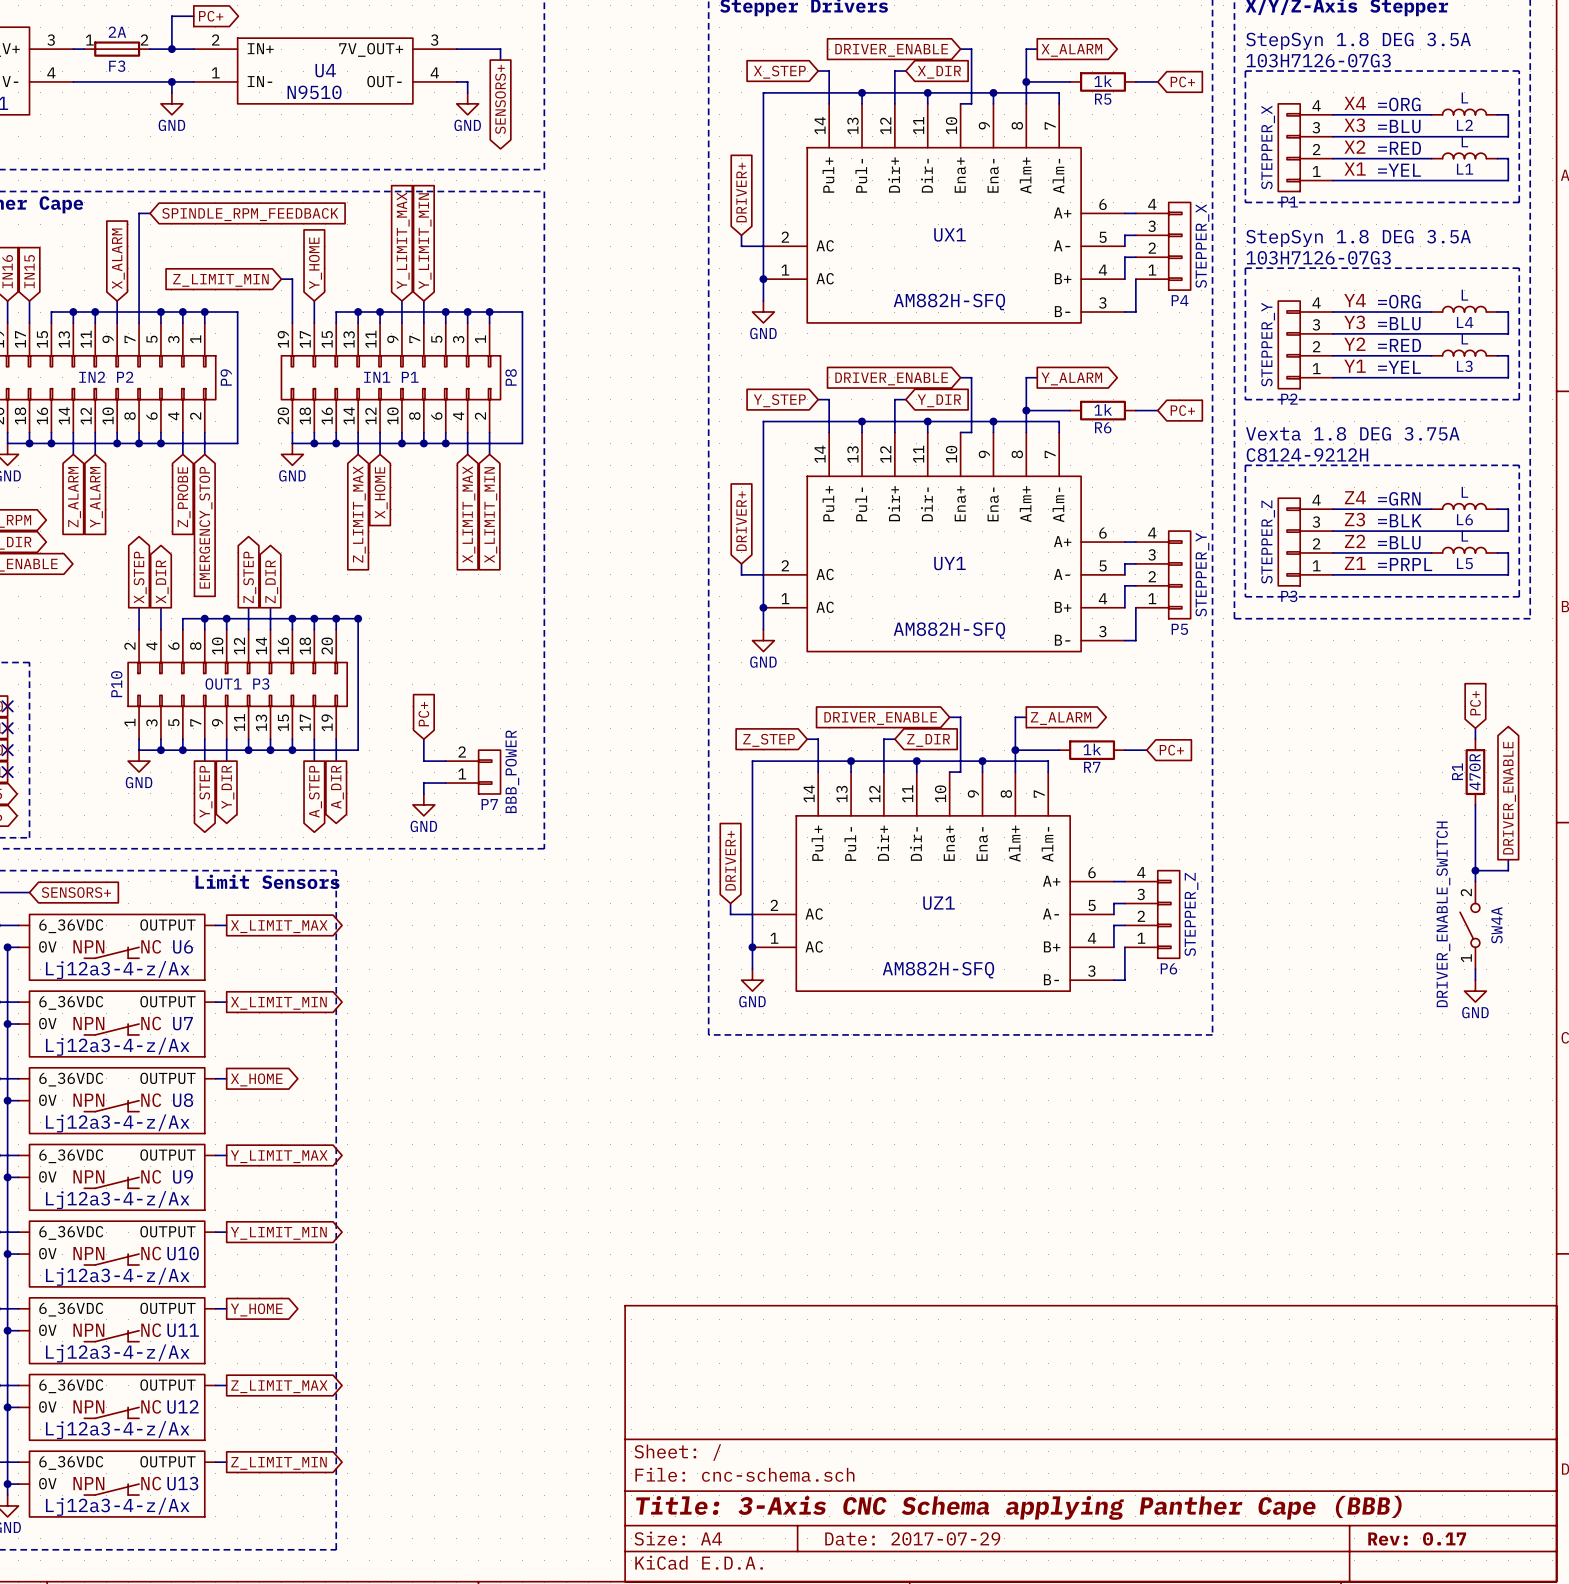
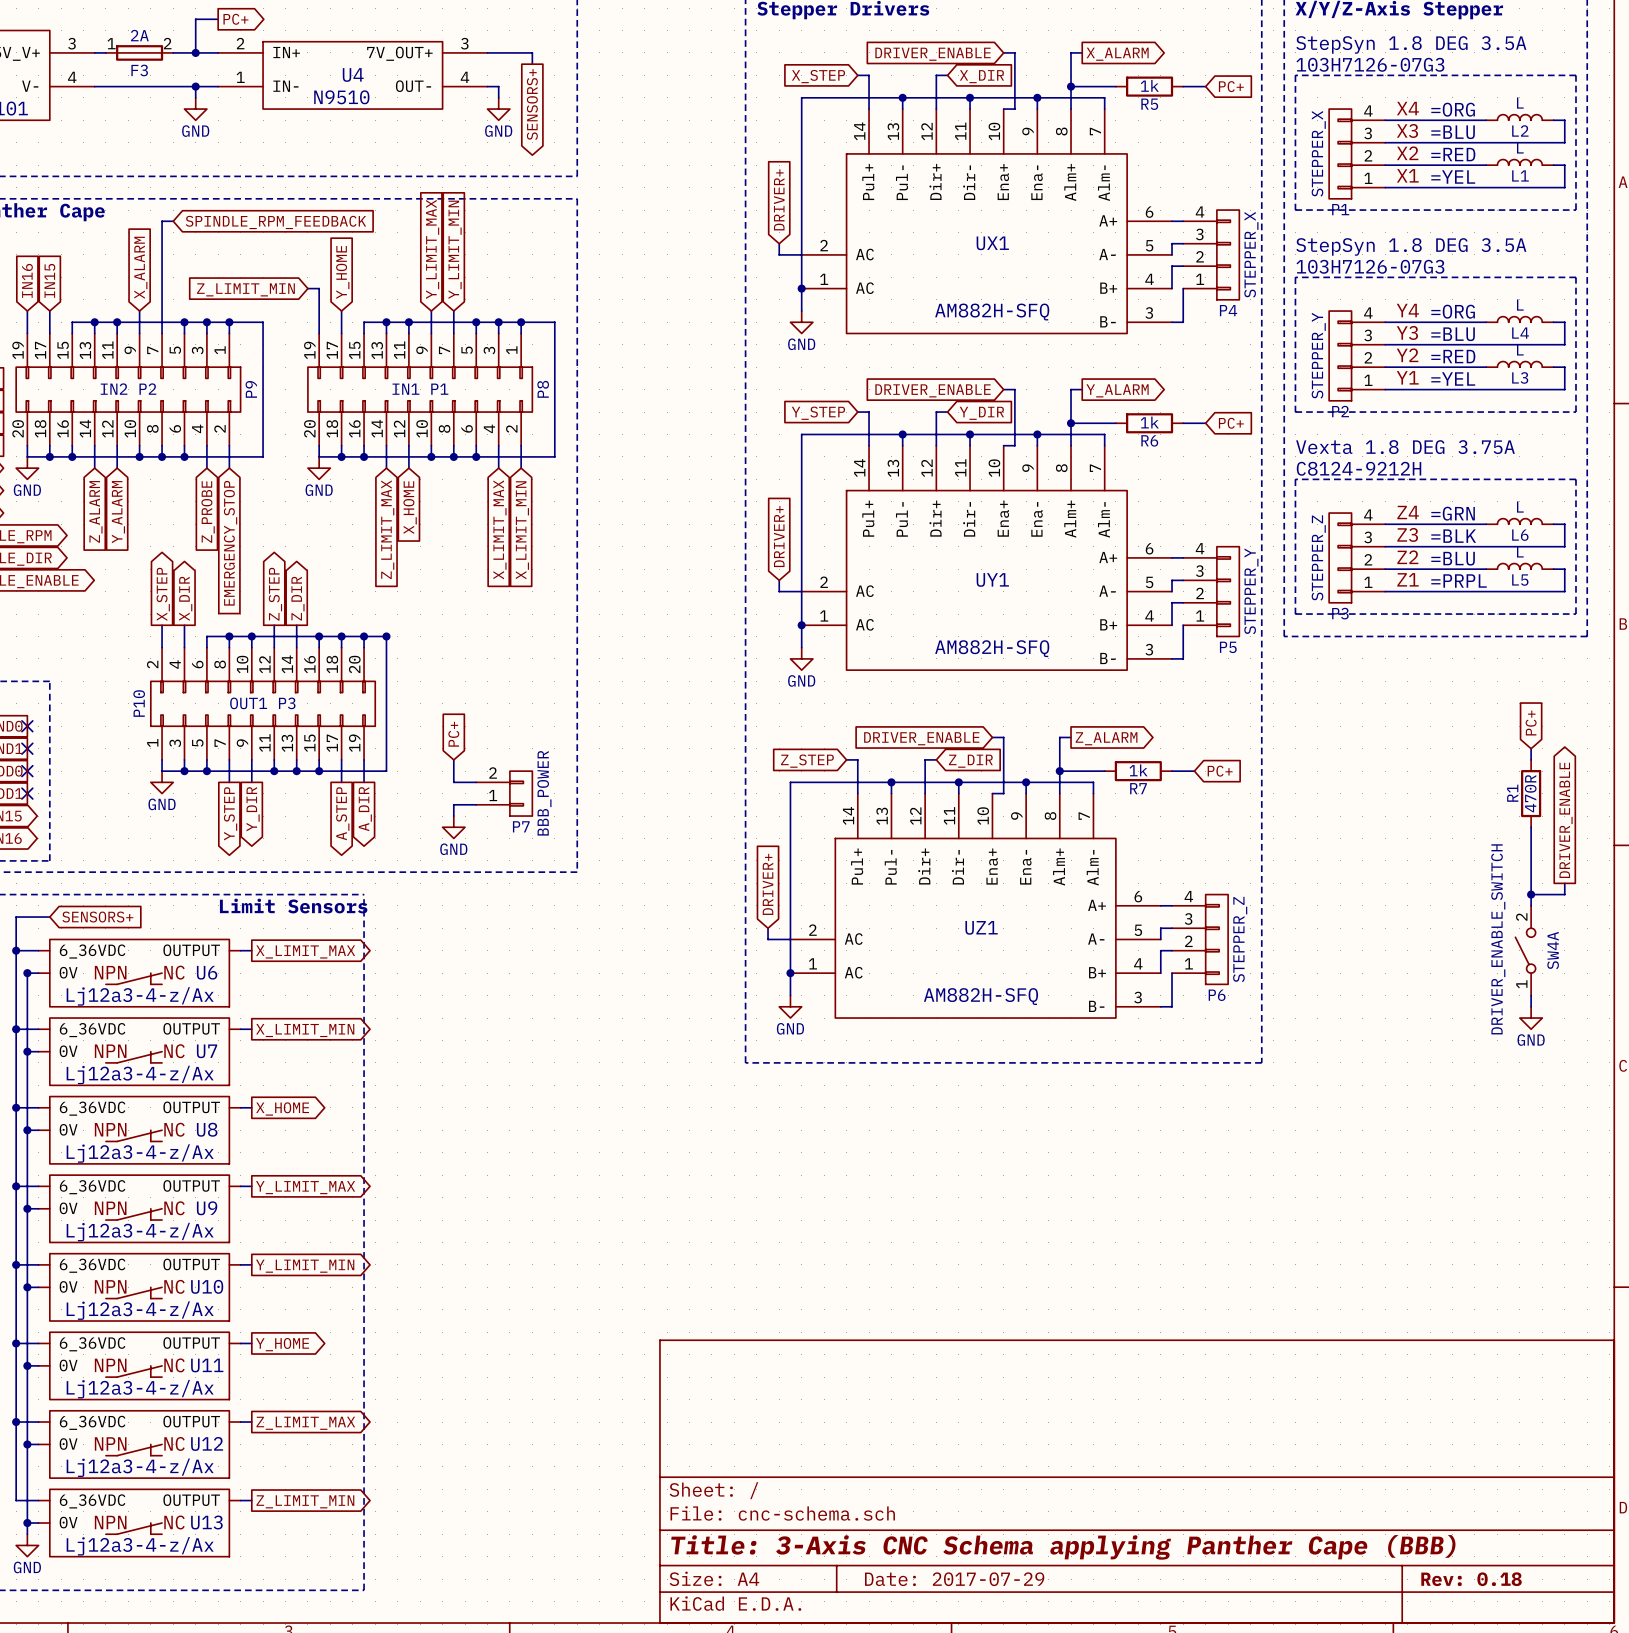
title block: Rev: 0.17 (1417, 1538) -> Rev: 0.18 (1471, 1579)

